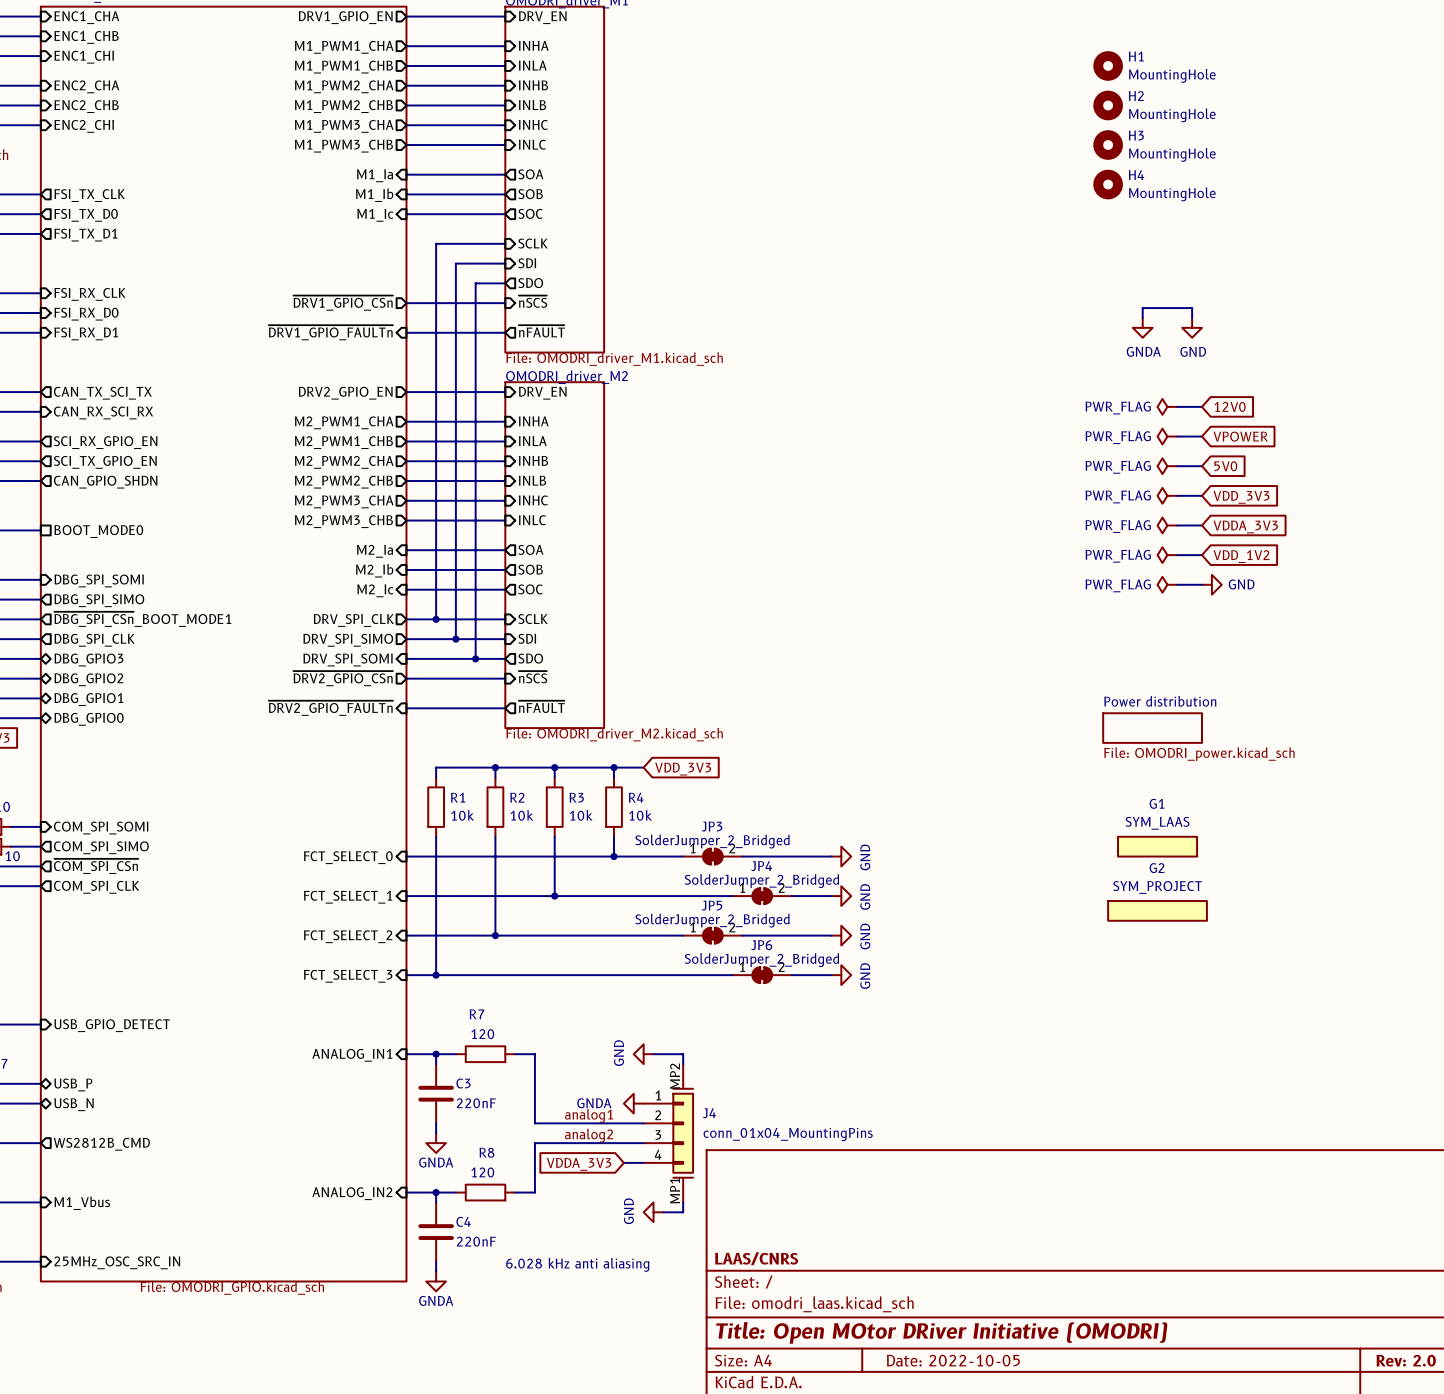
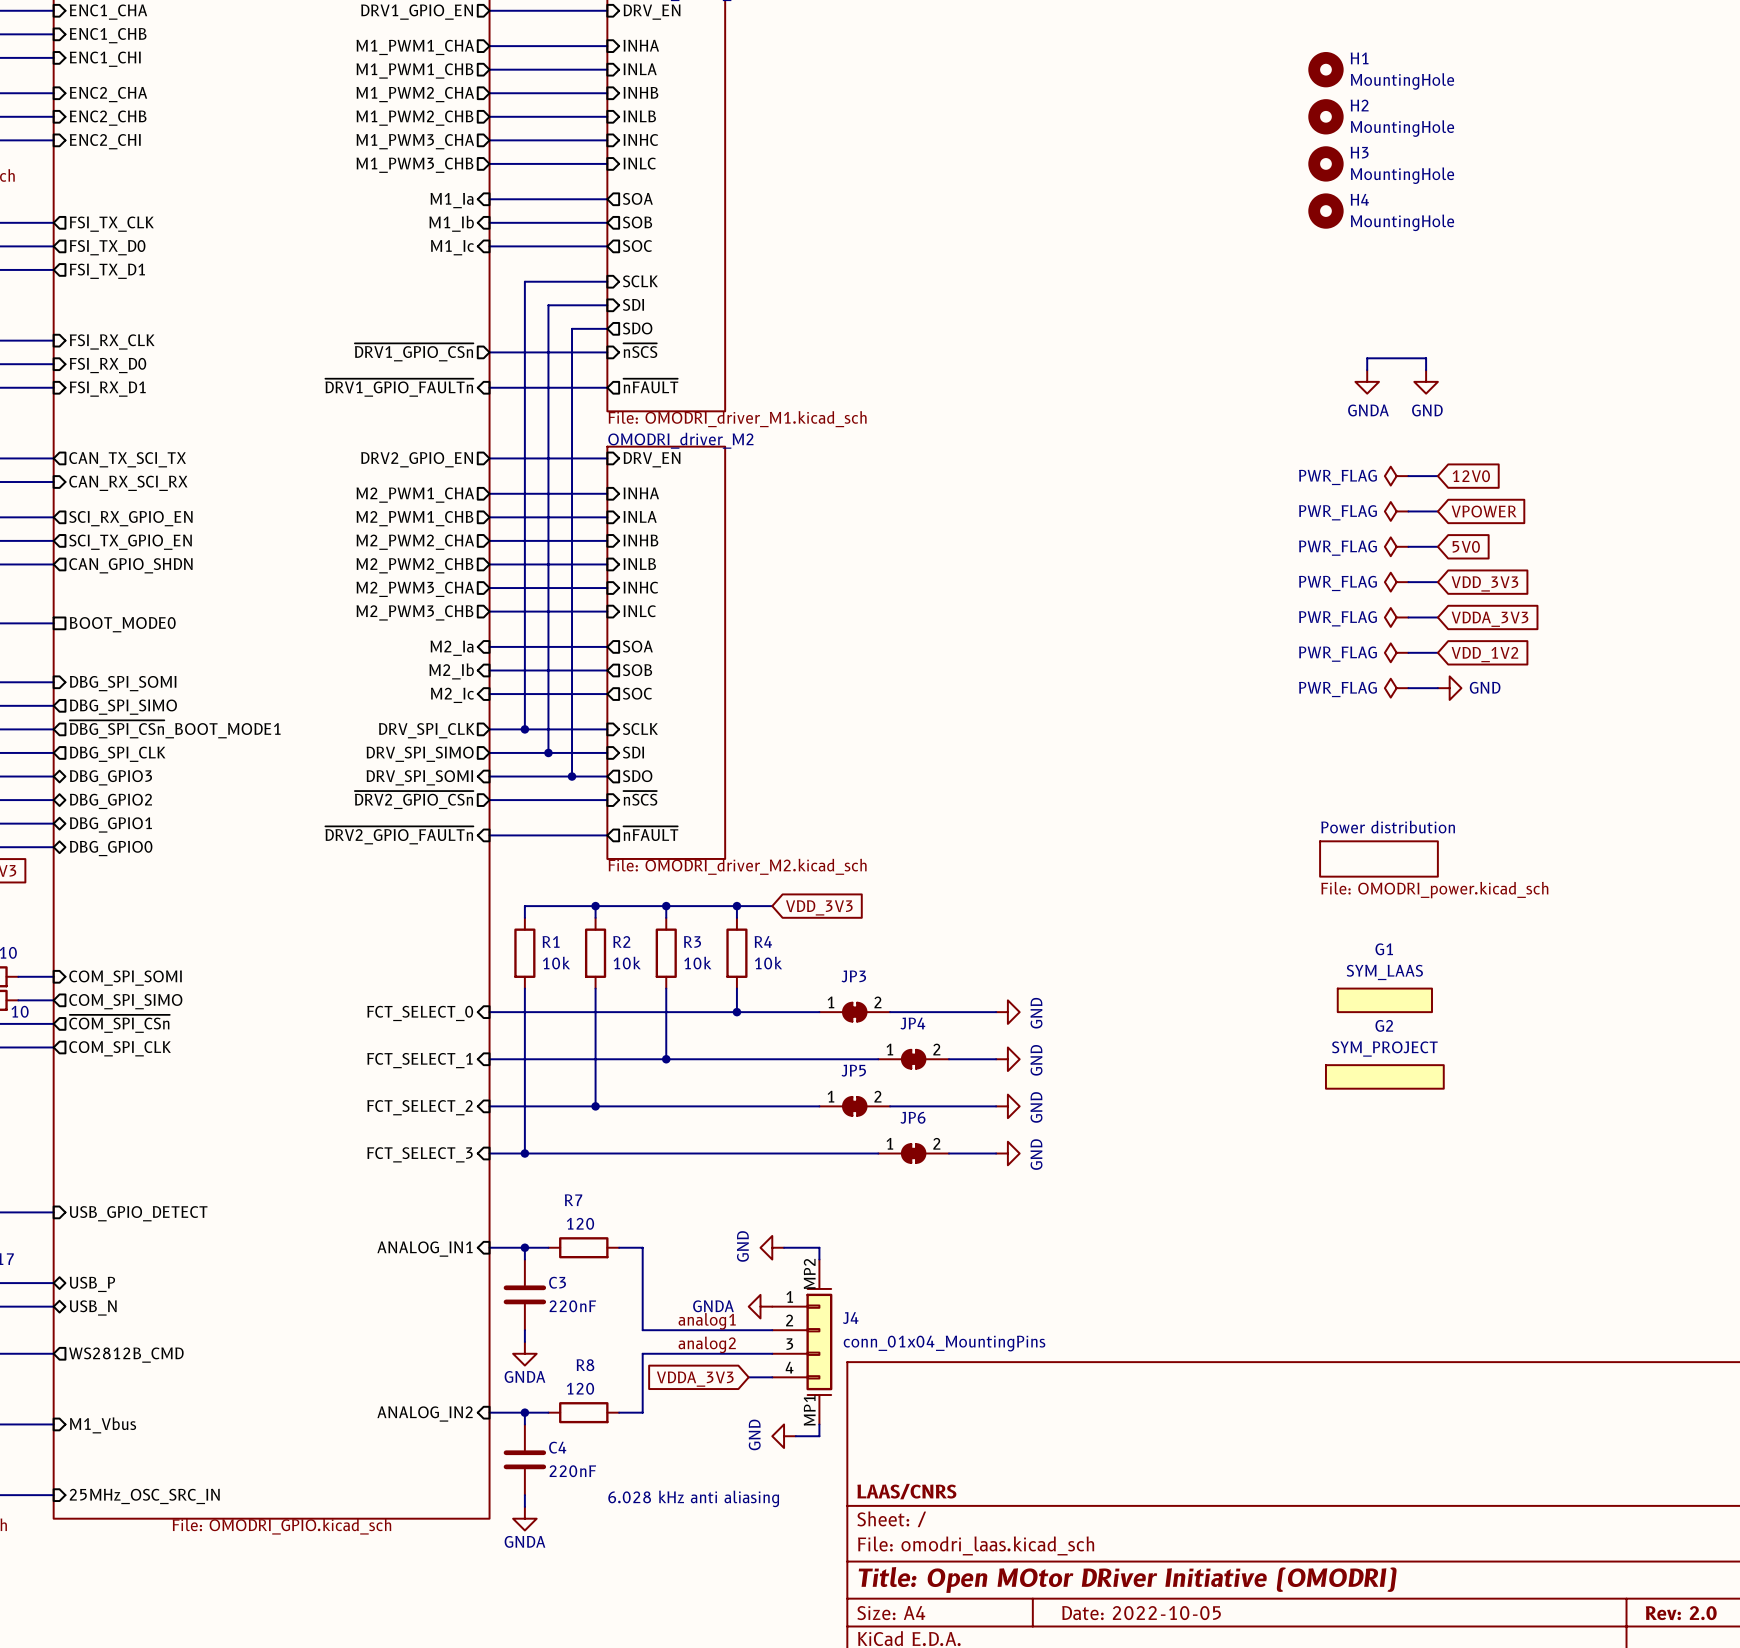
JP3 value: SolderJumper_2_Bridged (712, 841) -> none
JP4 value: SolderJumper_2_Bridged (761, 881) -> none
JP5 value: SolderJumper_2_Bridged (712, 920) -> none
JP6 value: SolderJumper_2_Bridged (761, 960) -> none

